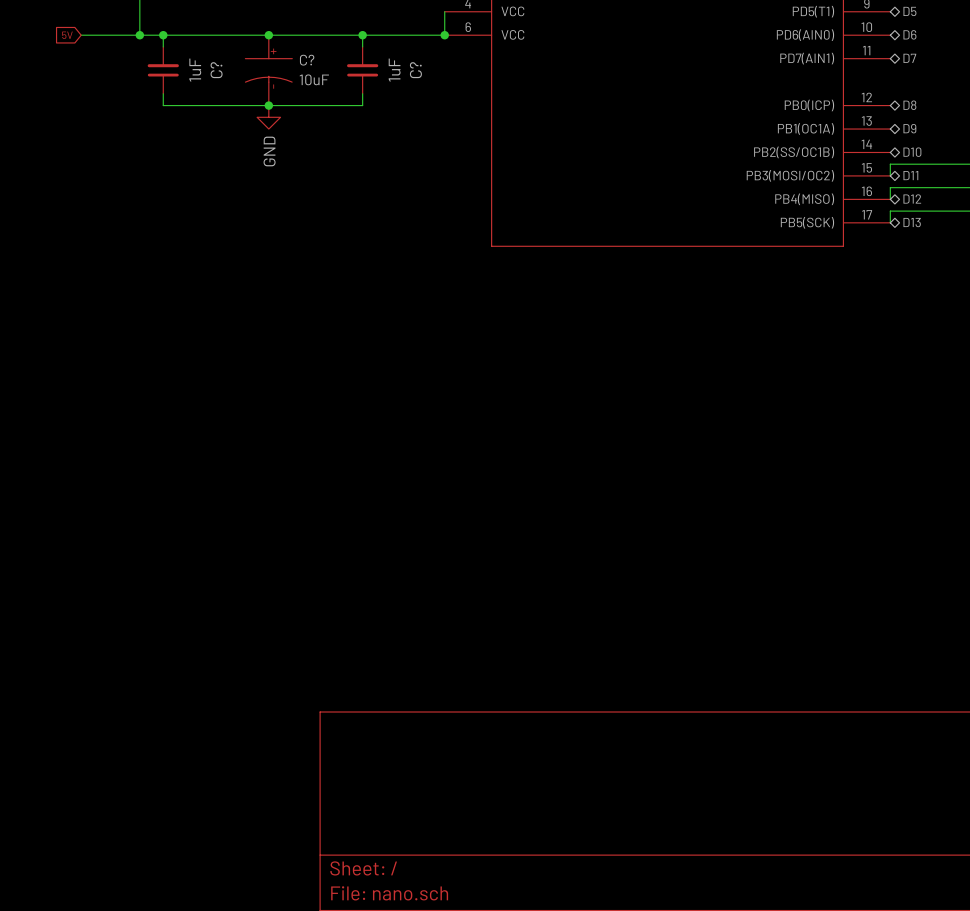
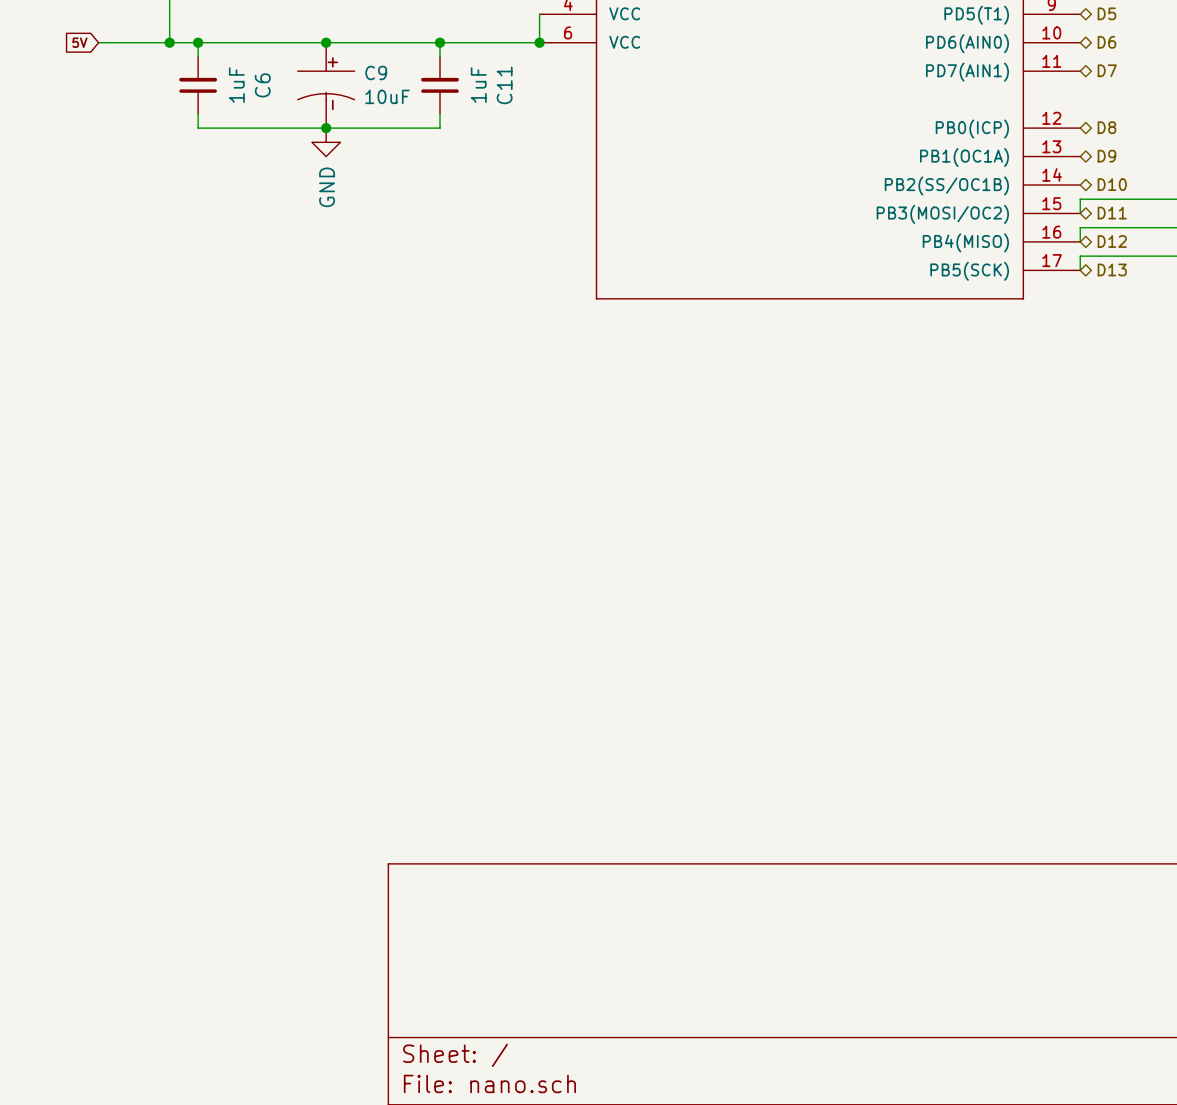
C? name: C? (307, 60) -> C9 (376, 72)
C? name: C? (216, 70) -> C6 (262, 85)
C? name: C? (415, 70) -> C11 (504, 85)

